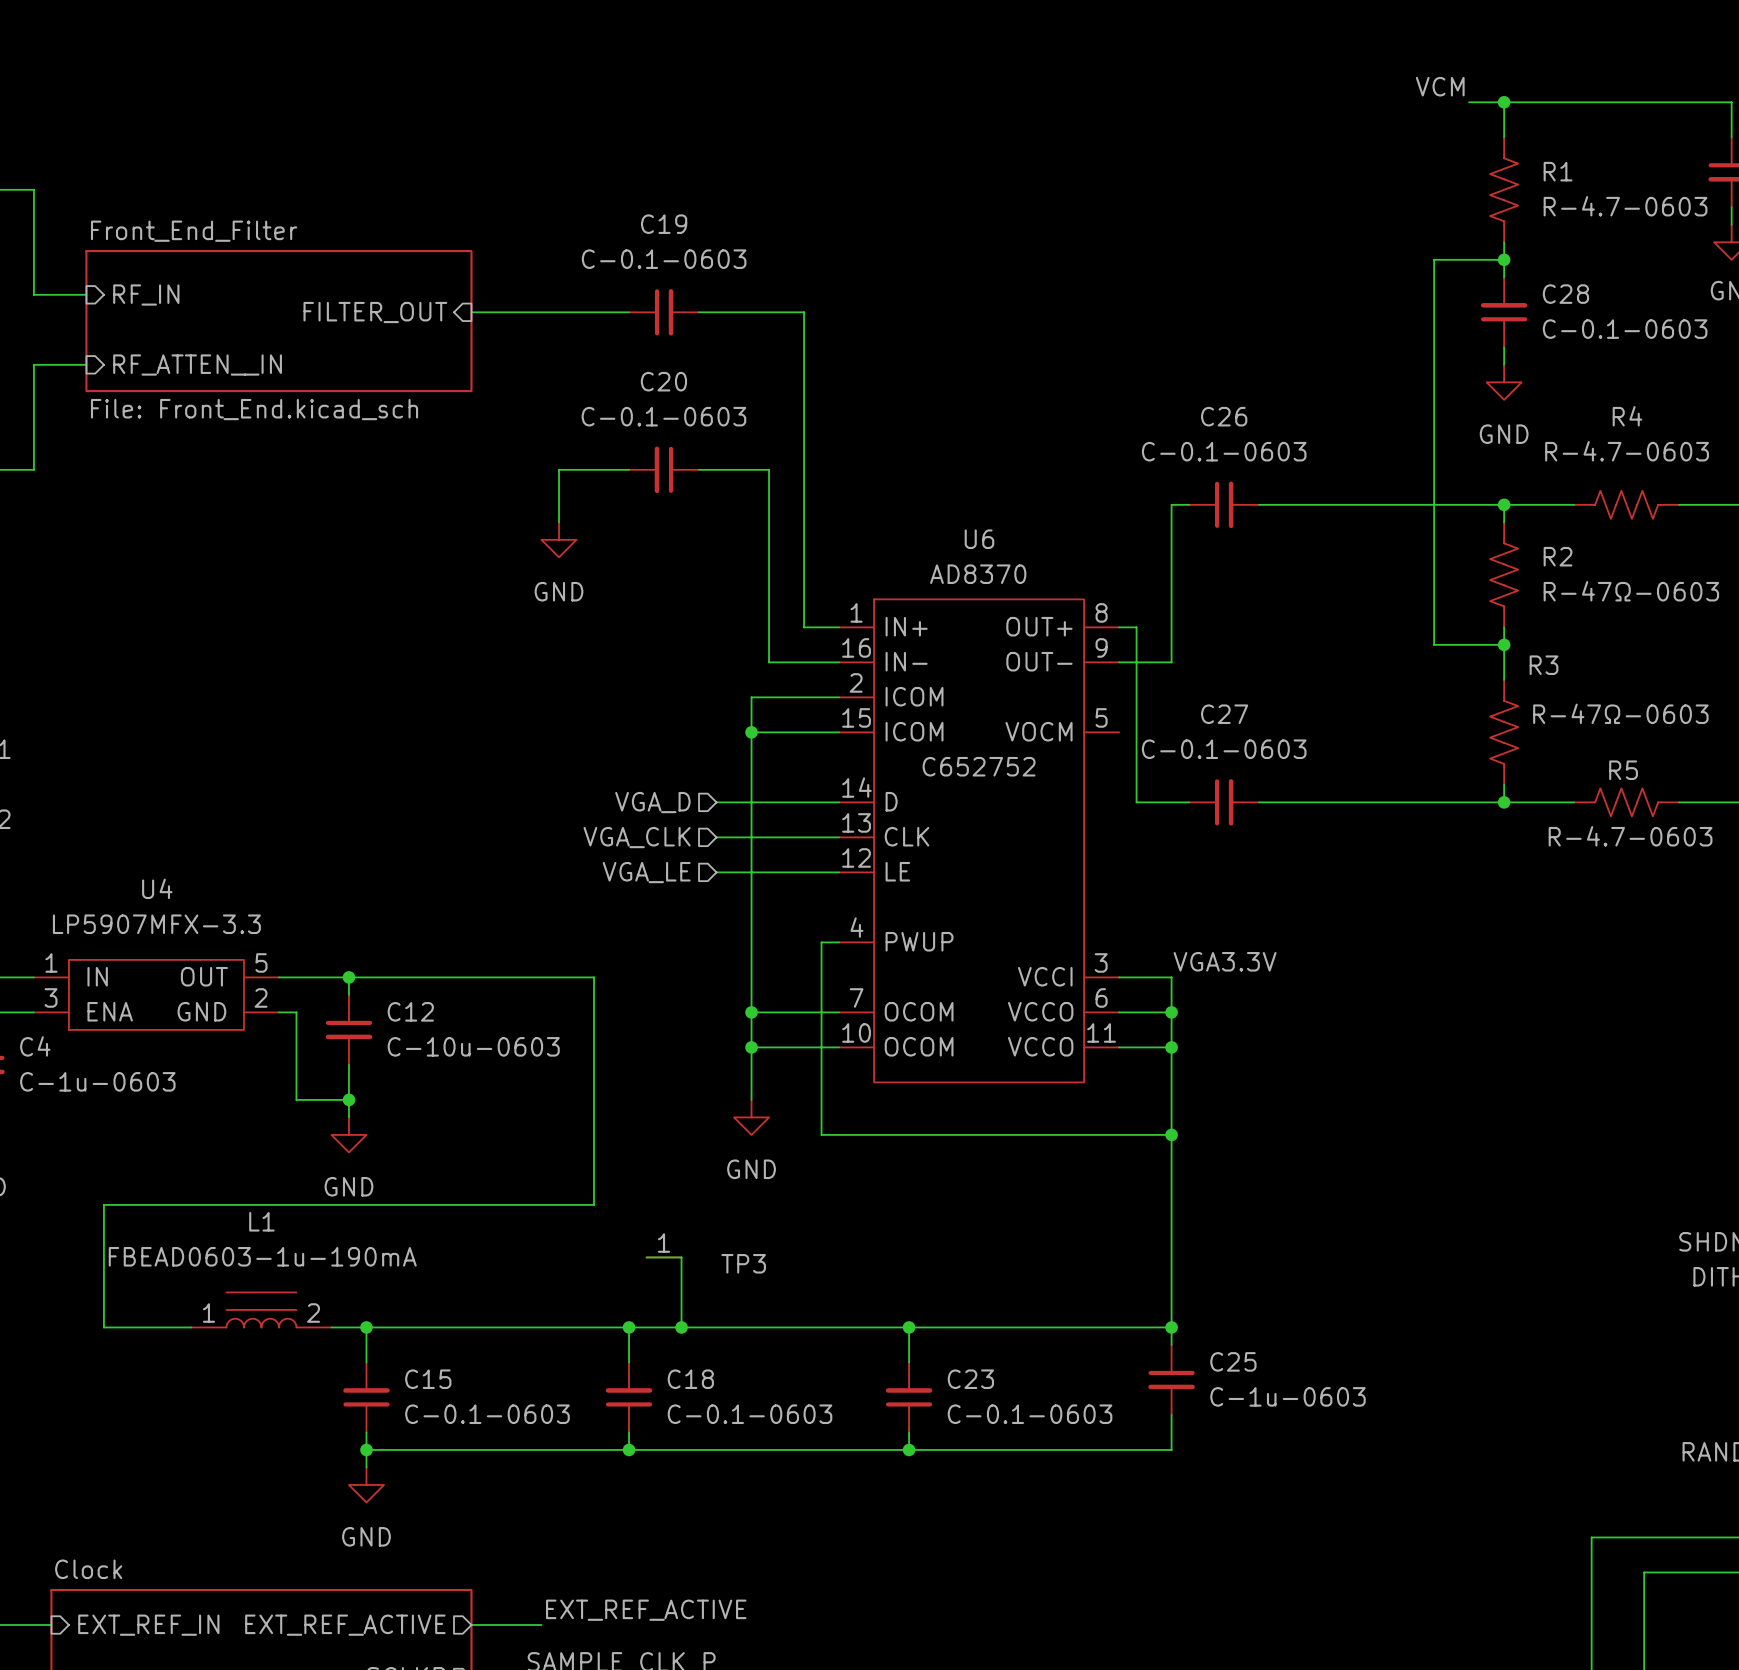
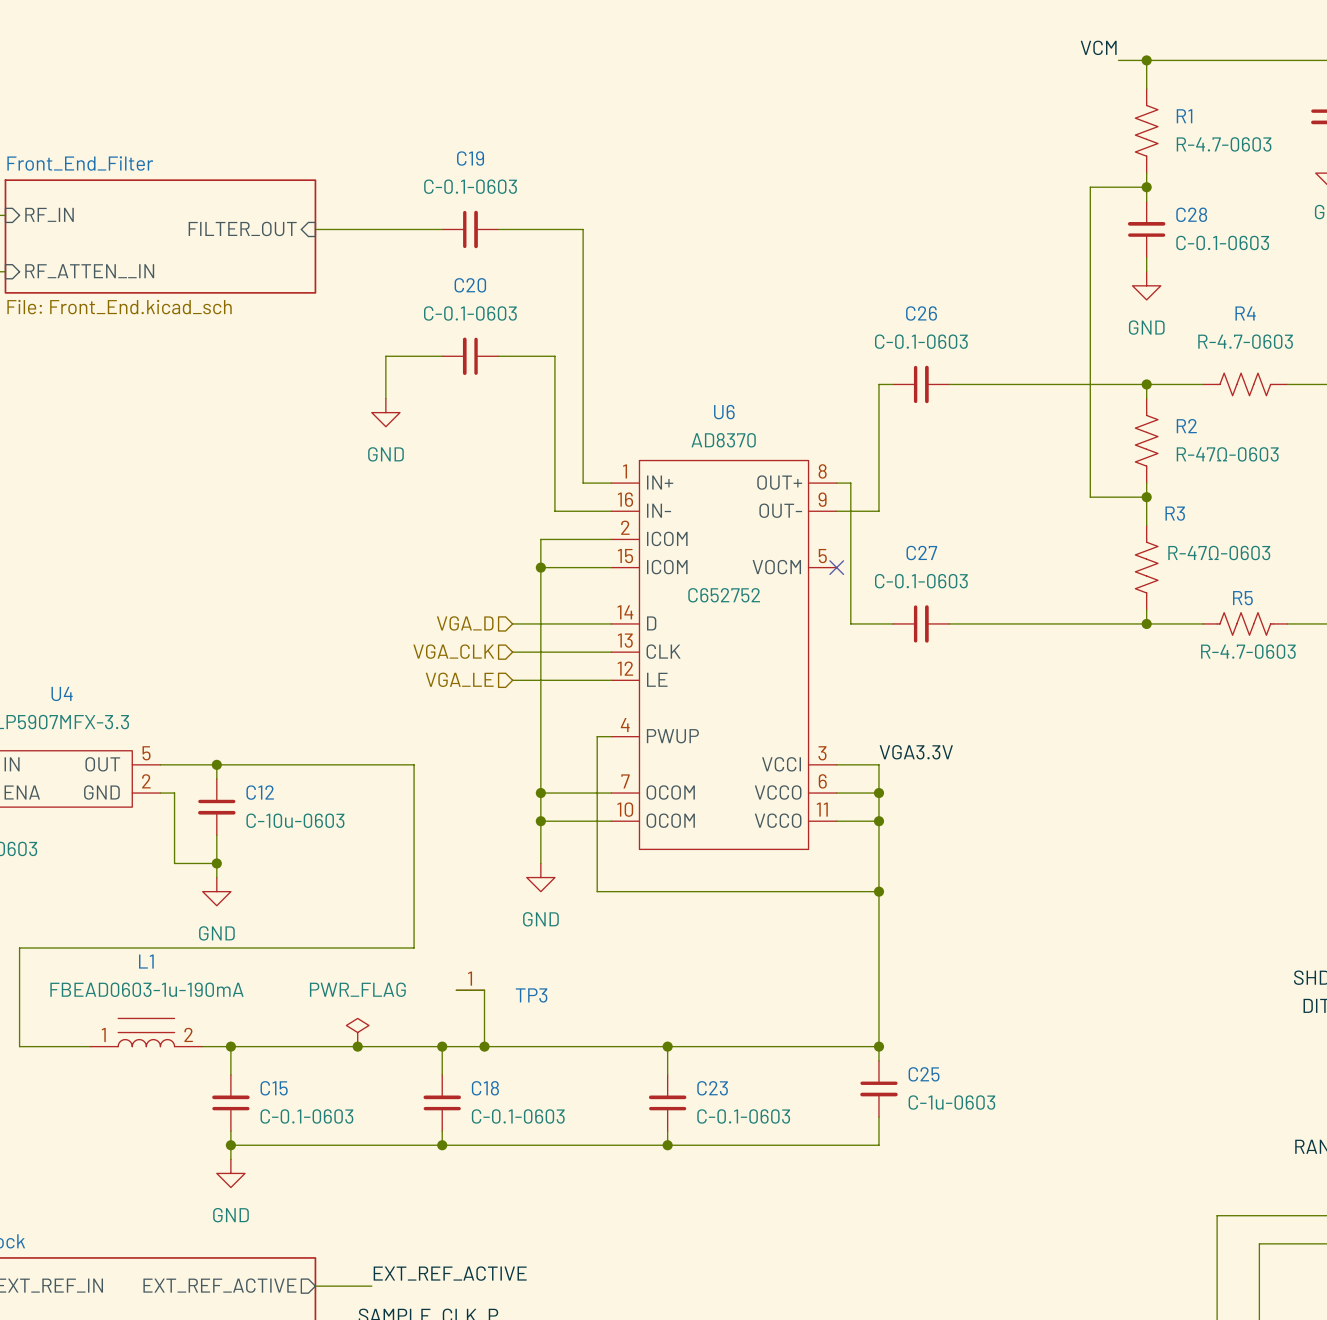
no-connect mark: none -> (836, 567)
power symbol: none -> PWR_FLAG (357, 1032)
junction: none -> (357, 1046)

